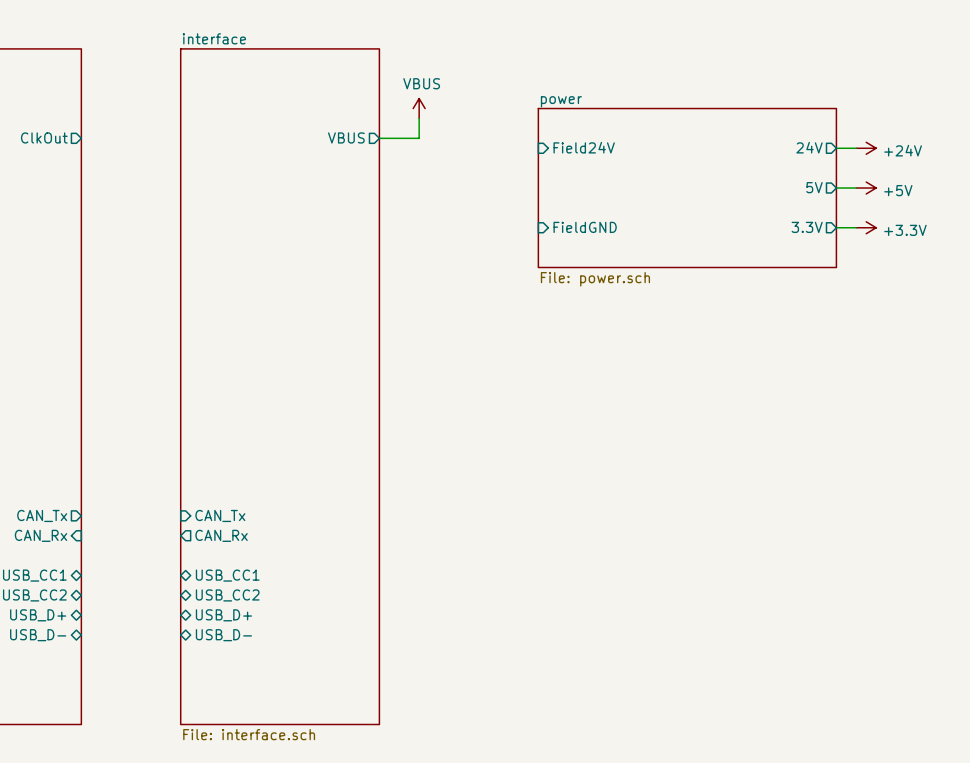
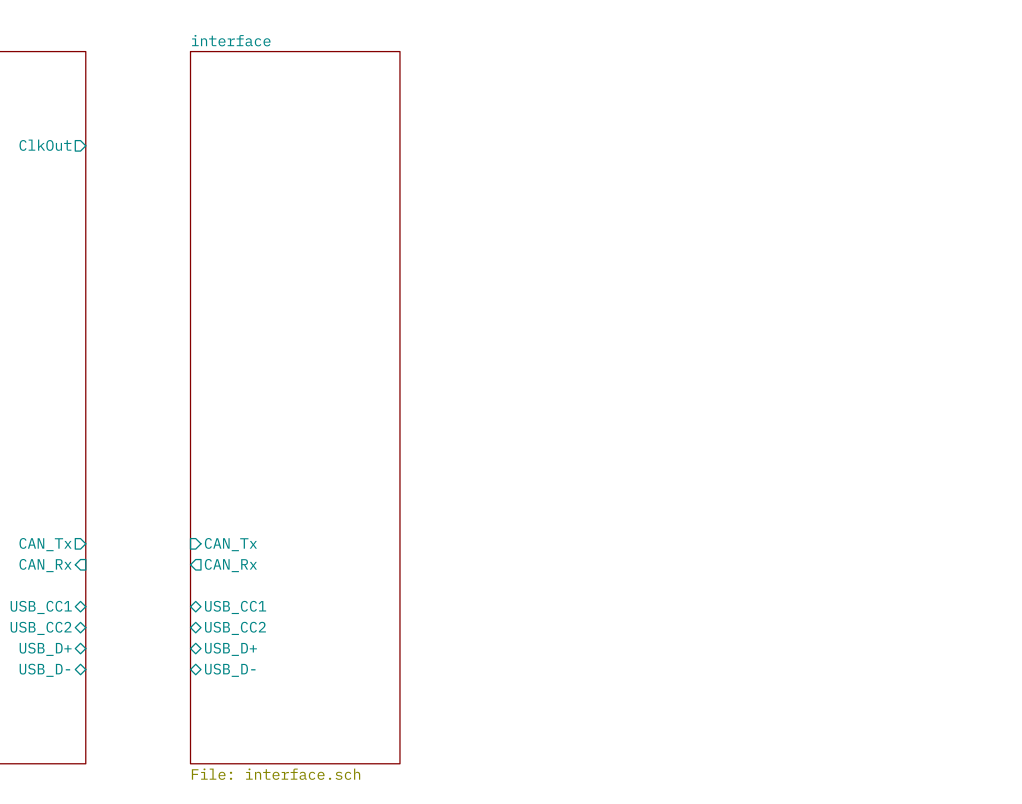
power symbol: VBUS (419, 108) -> none
wire: (419, 118) (419, 138) (379, 138) -> none
sheet pin: VBUS (346, 137) -> none
sheet pin: Field24V (584, 147) -> none
sheet pin: 24V (809, 147) -> none
wire: (836, 148) (856, 148) -> none
power symbol: +24V (866, 148) -> none
sheet pin: 5V (814, 187) -> none
sheet power: File: power.sch (687, 188) -> none
wire: (836, 188) (856, 188) -> none
power symbol: +5V (866, 188) -> none
sheet pin: FieldGND (585, 227) -> none
sheet pin: 3.3V (807, 227) -> none
wire: (836, 227) (856, 227) -> none
power symbol: +3.3V (866, 227) -> none

